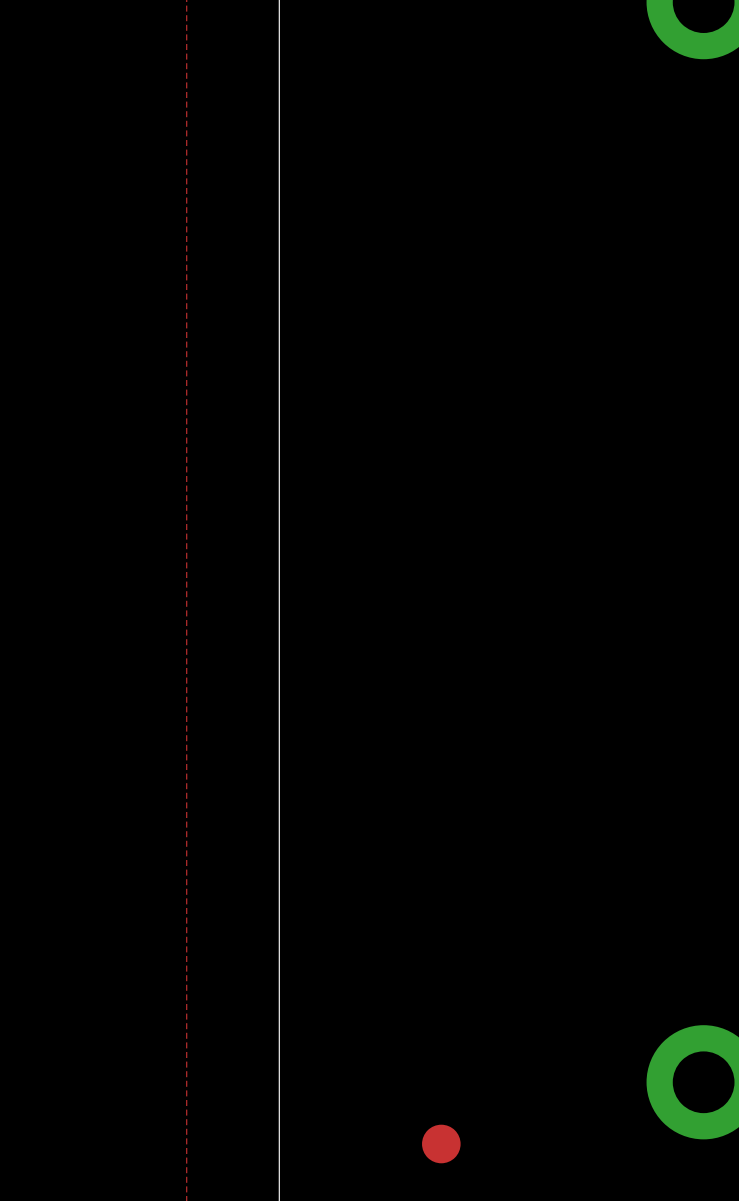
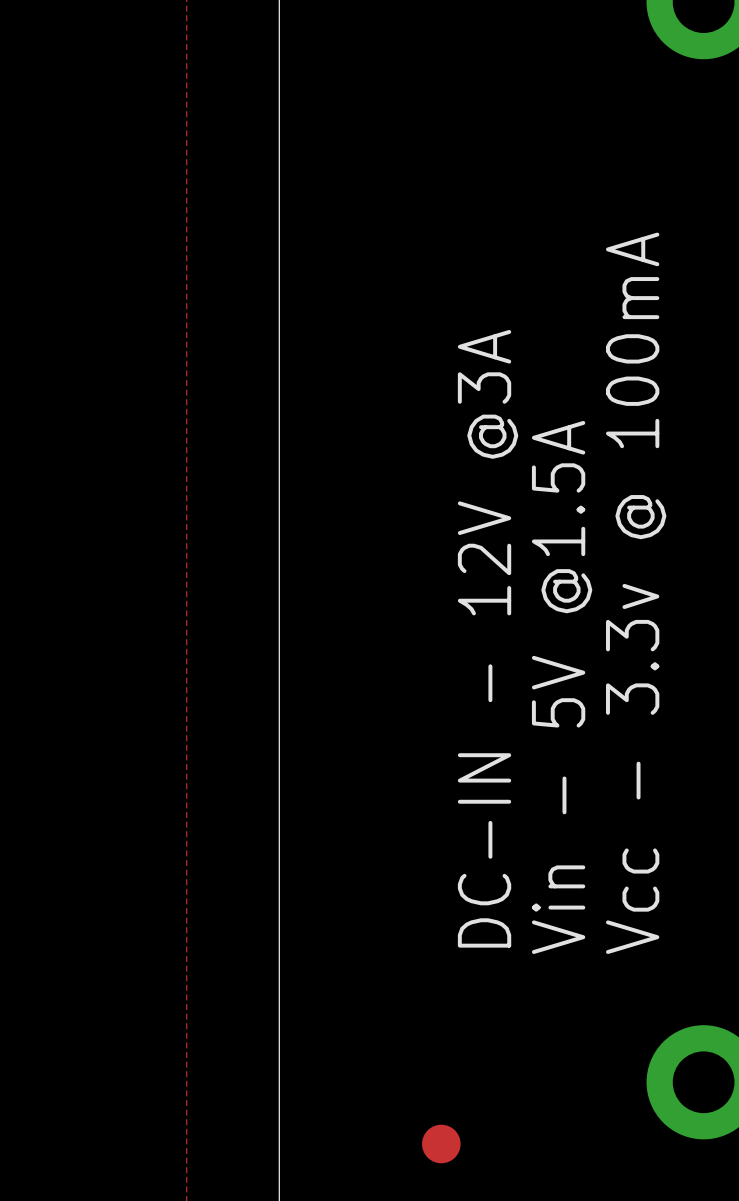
text: none -> Vcc - 3.3v @ 100mA (636, 593)
text: none -> DC-IN - 12V @3A (488, 638)
text: none -> Vin - 5V @1.5A (562, 687)

